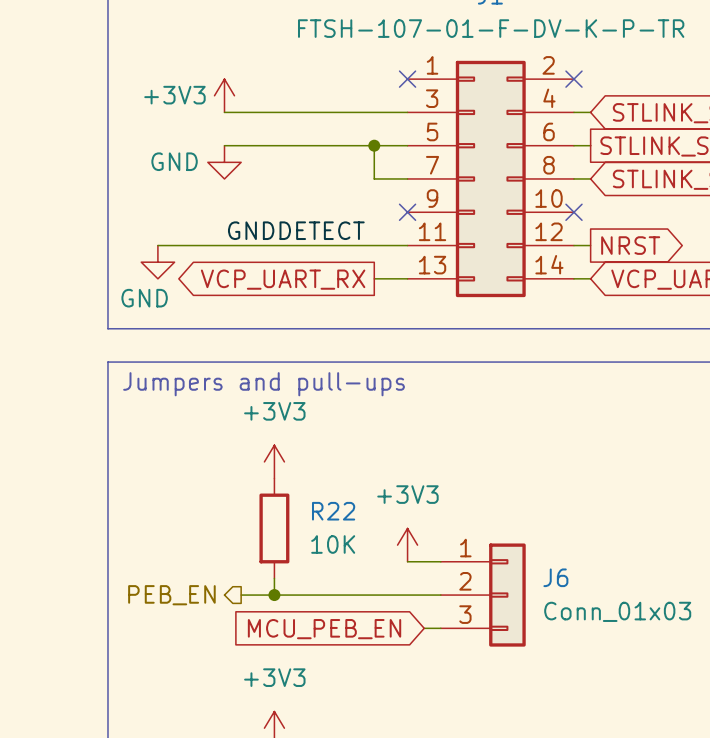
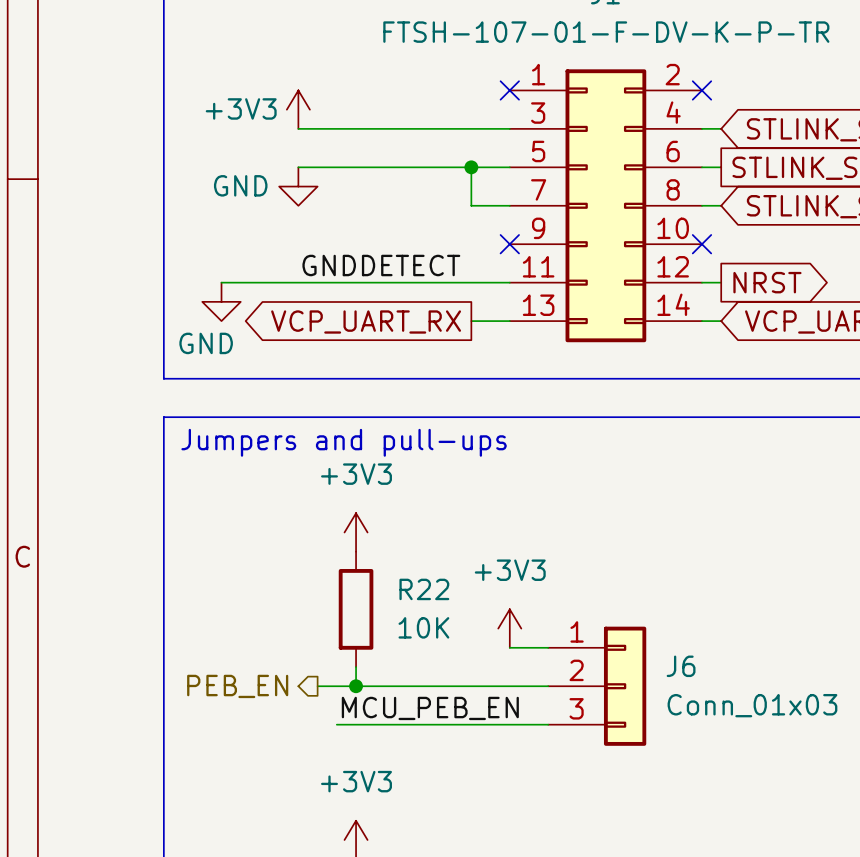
label: none -> MCU_PEB_EN (430, 708)
wire: none -> (336, 724) (529, 724)
global label: MCU_PEB_EN (324, 629) -> none

